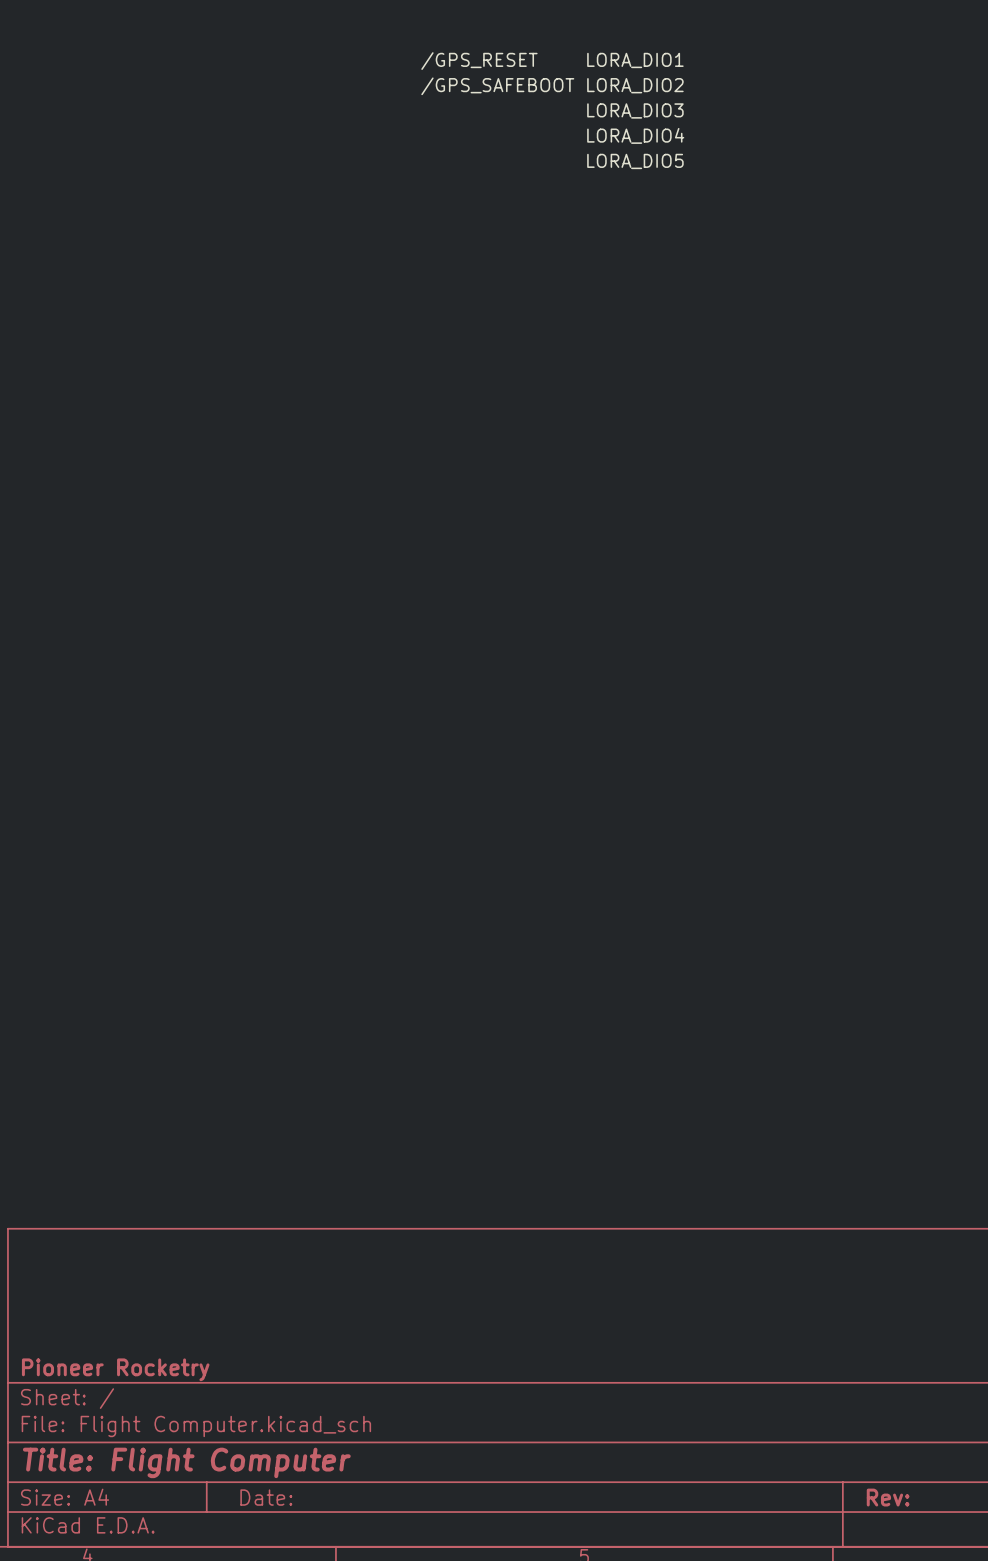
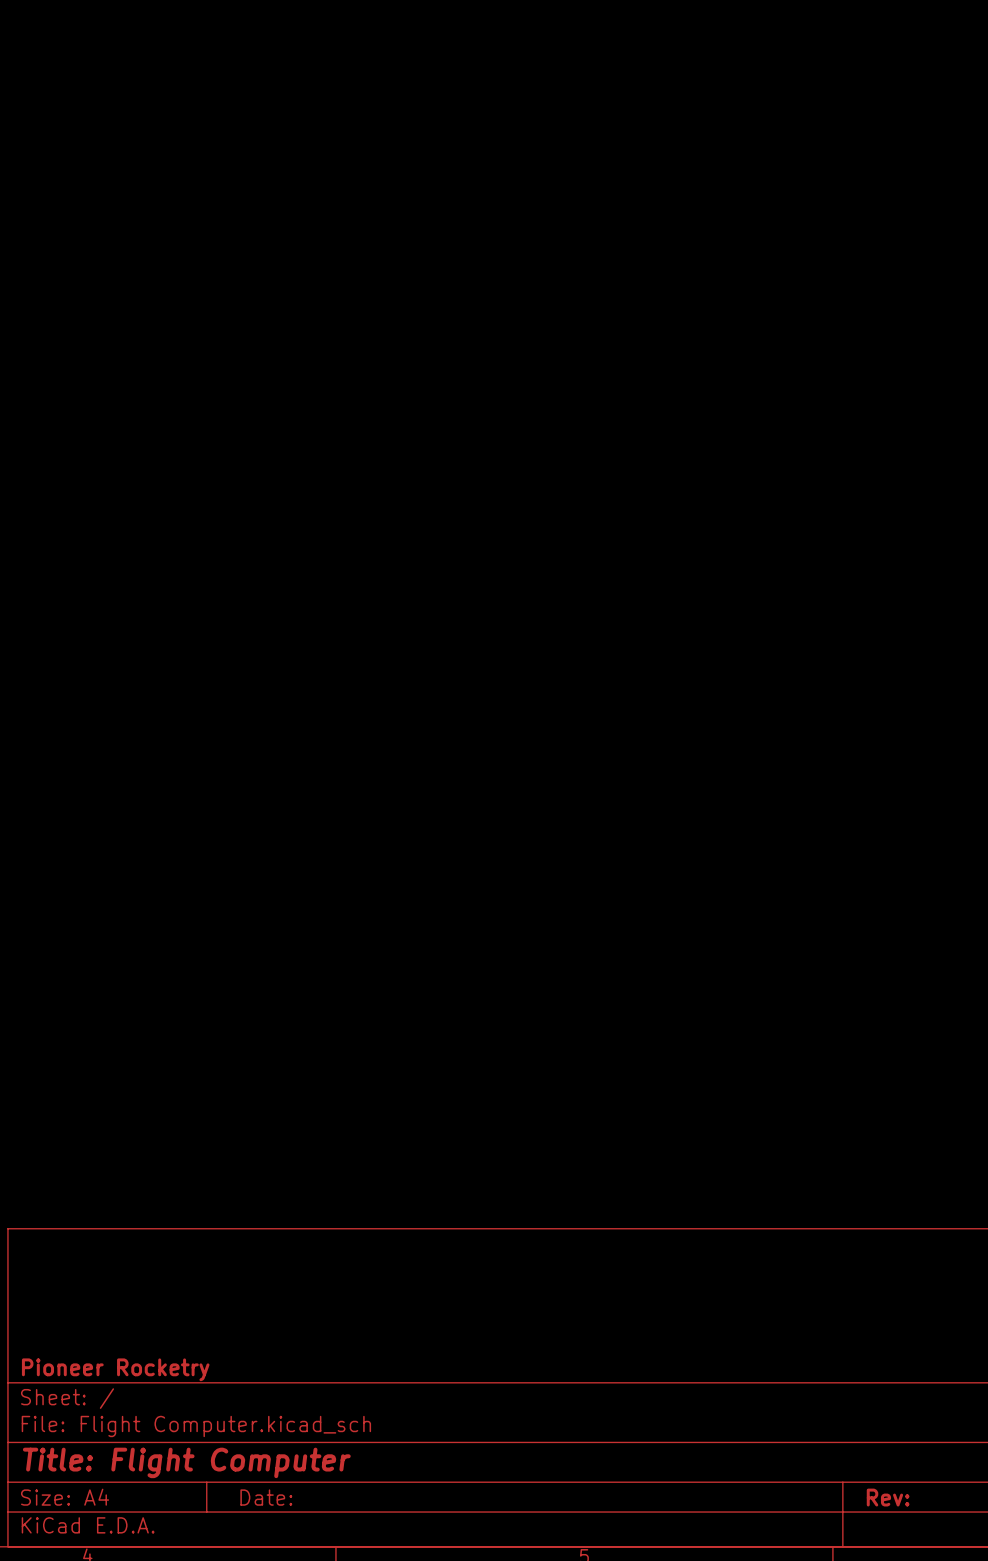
label: LORA_DIO1 (635, 60) -> none
label: /GPS_RESET (479, 61) -> none
label: LORA_DIO2 (635, 85) -> none
label: /GPS_SAFEBOOT (497, 86) -> none
label: LORA_DIO3 (635, 110) -> none
label: LORA_DIO4 (635, 135) -> none
label: LORA_DIO5 (635, 161) -> none

